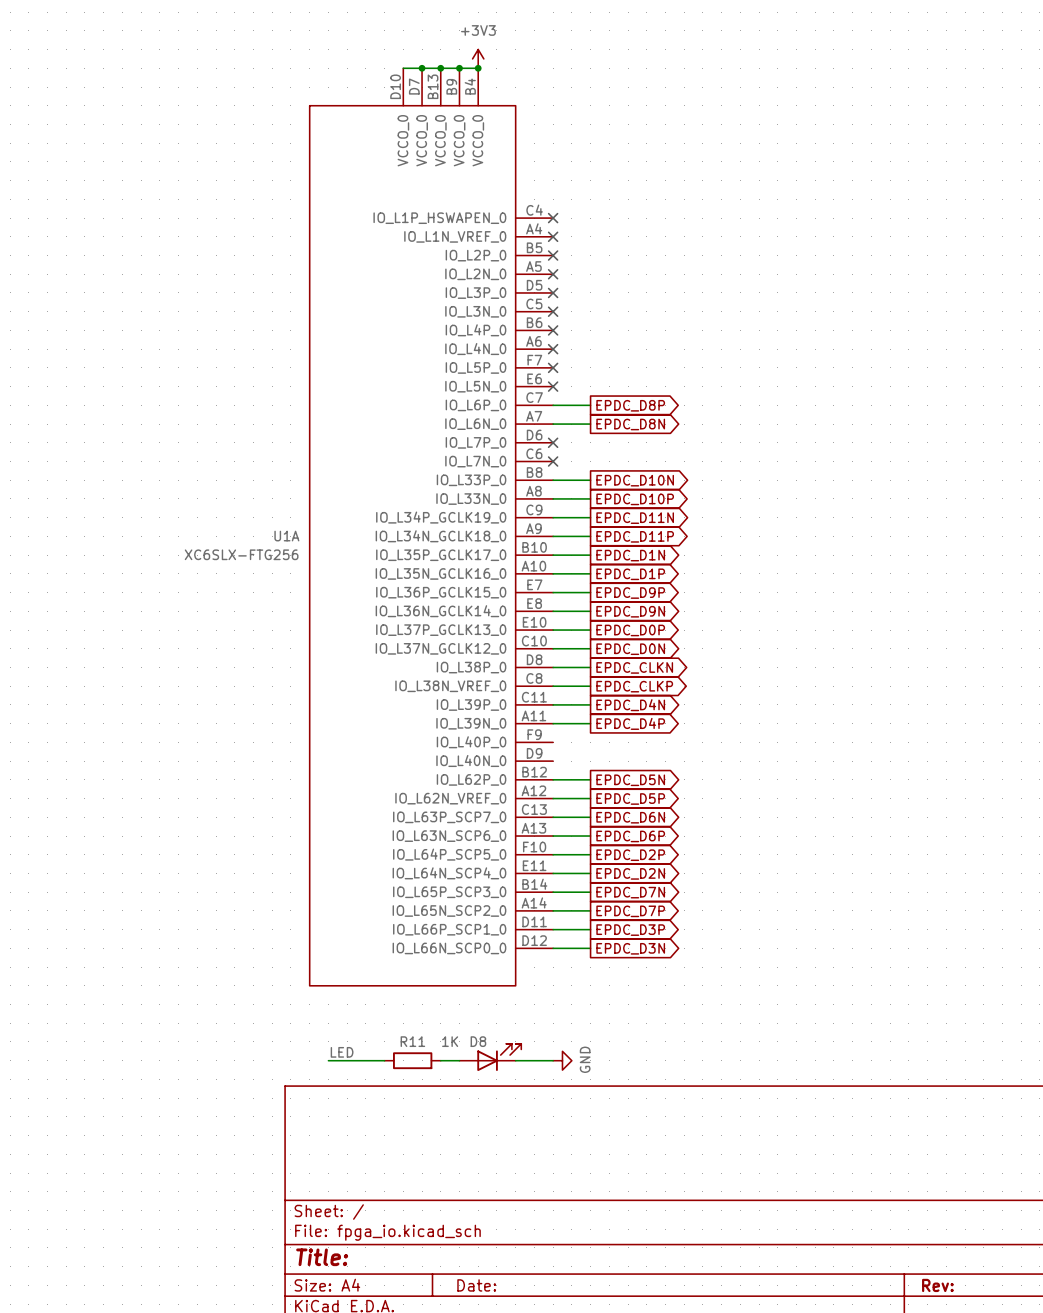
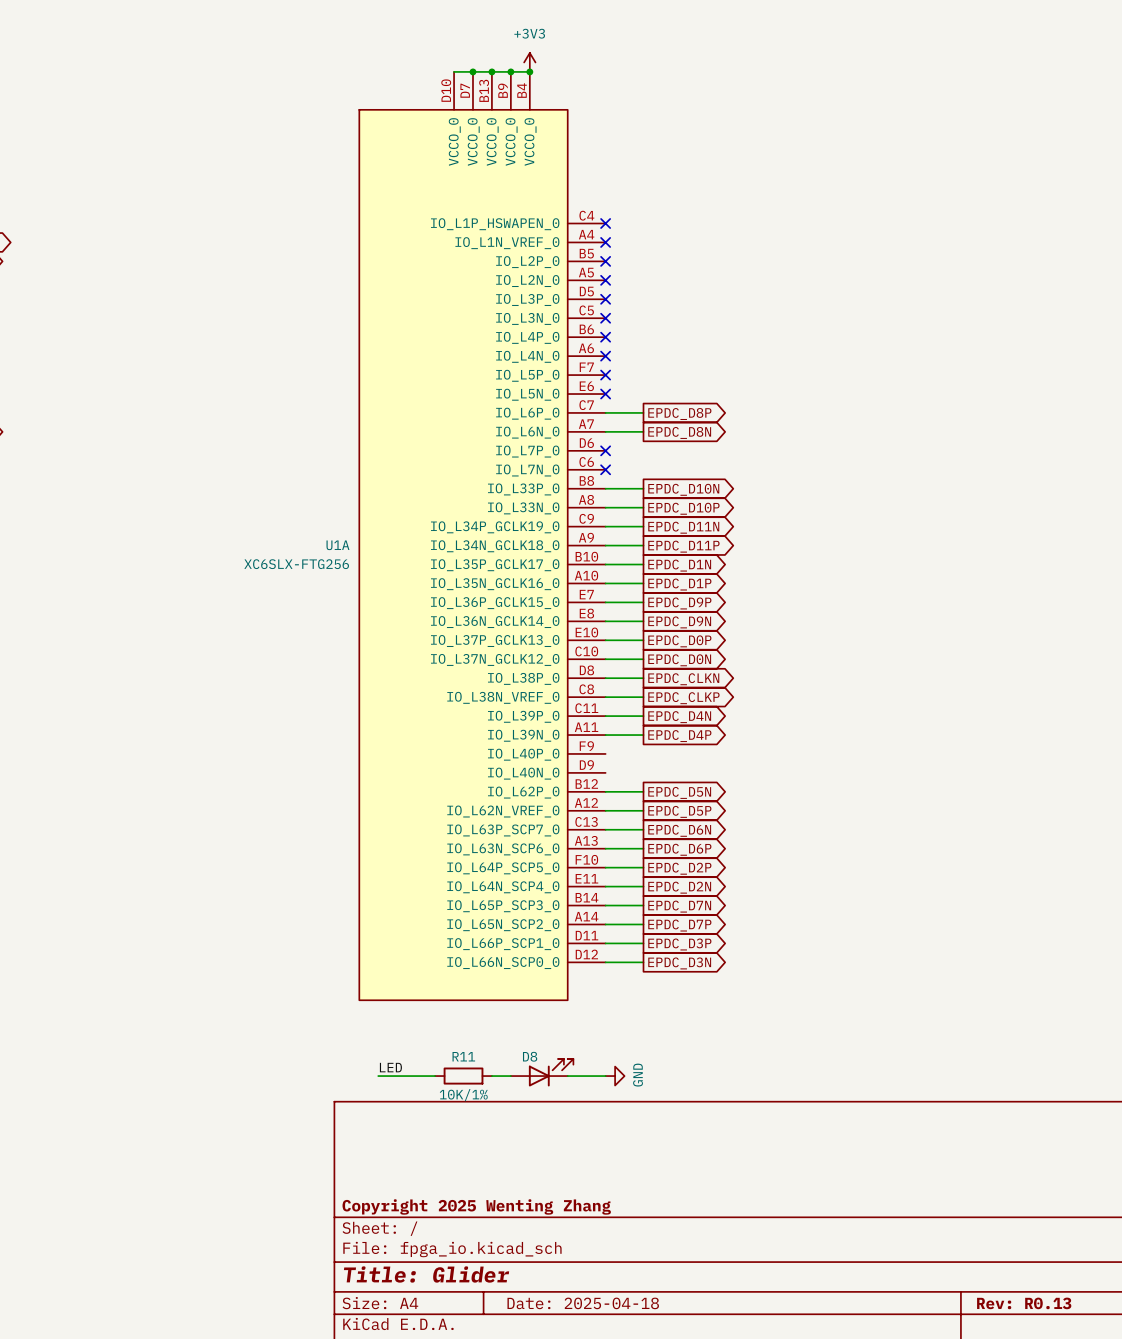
R11 value: 1K (450, 1041) -> 10K/1% (463, 1095)
title block: none -> Copyright 2025 Wenting Zhang (476, 1206)
title block: Title: (322, 1257) -> Title: Glider (426, 1274)
title block: Date: (476, 1285) -> Date: 2025-04-18 (583, 1303)
title block: Rev: (937, 1285) -> Rev: R0.13 (1024, 1303)

